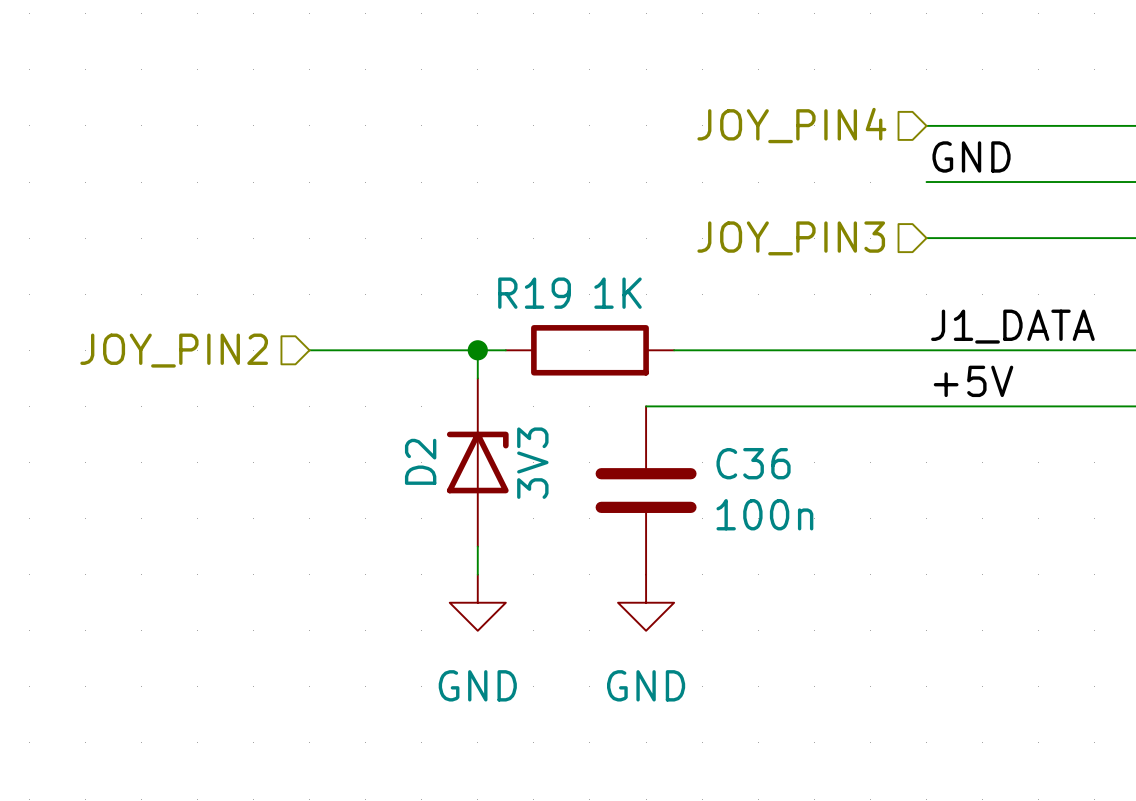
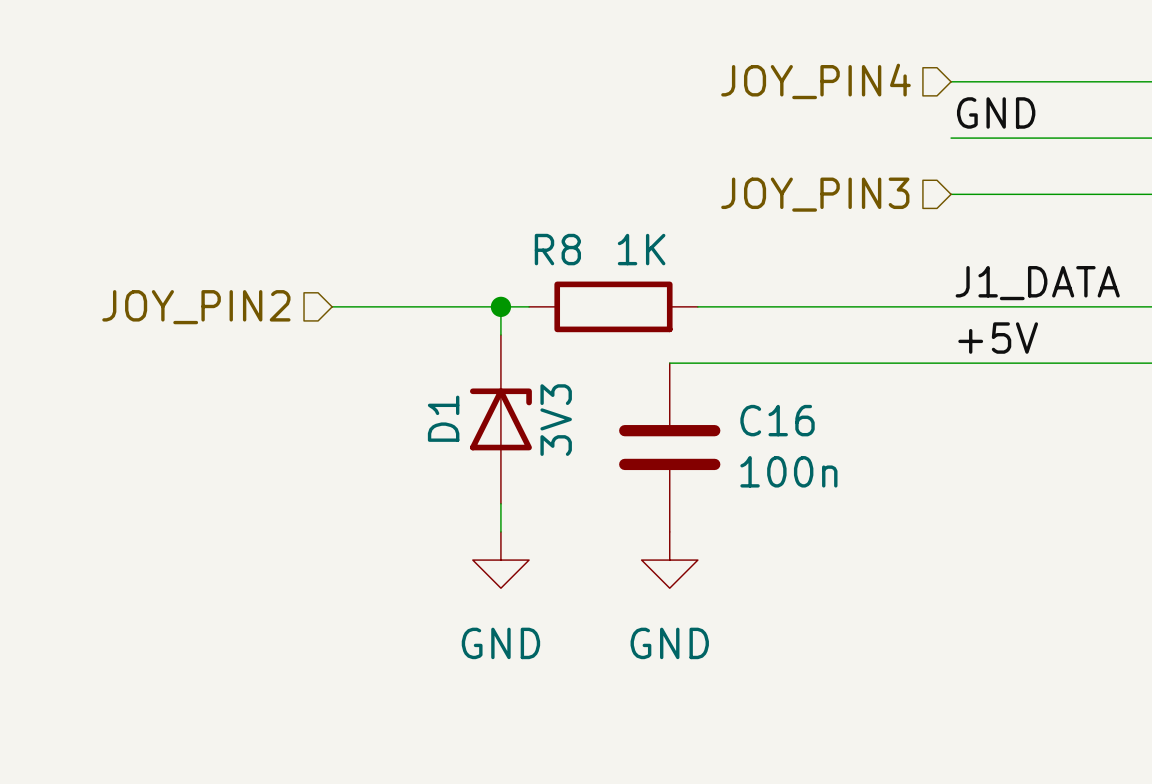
R19 name: R19 (534, 293) -> R8 (557, 249)
D2 name: D2 (420, 461) -> D1 (443, 418)
C36 name: C36 (753, 463) -> C16 (777, 420)

